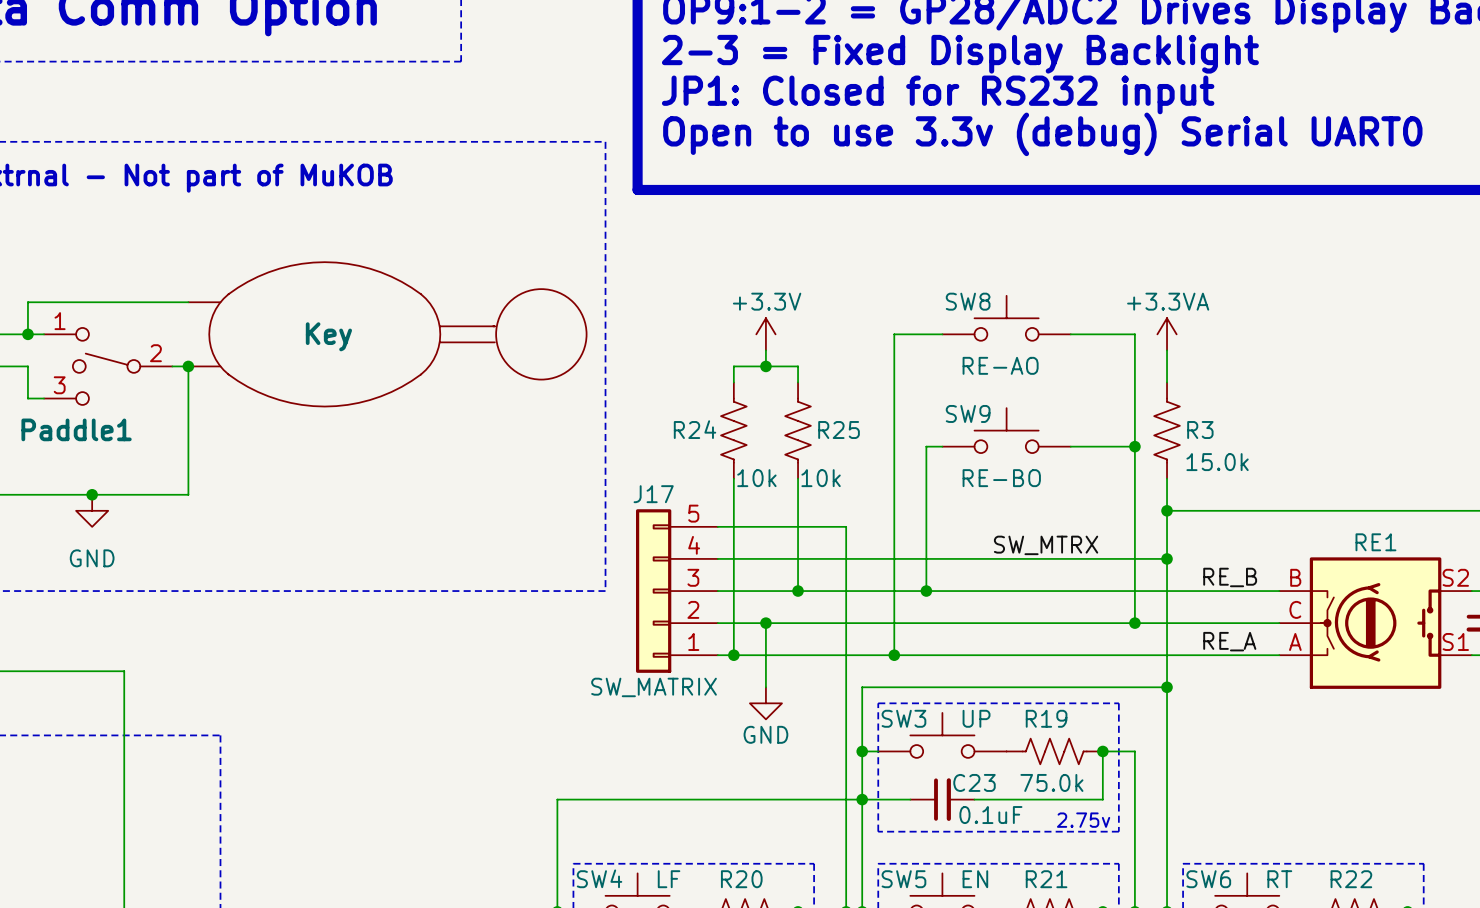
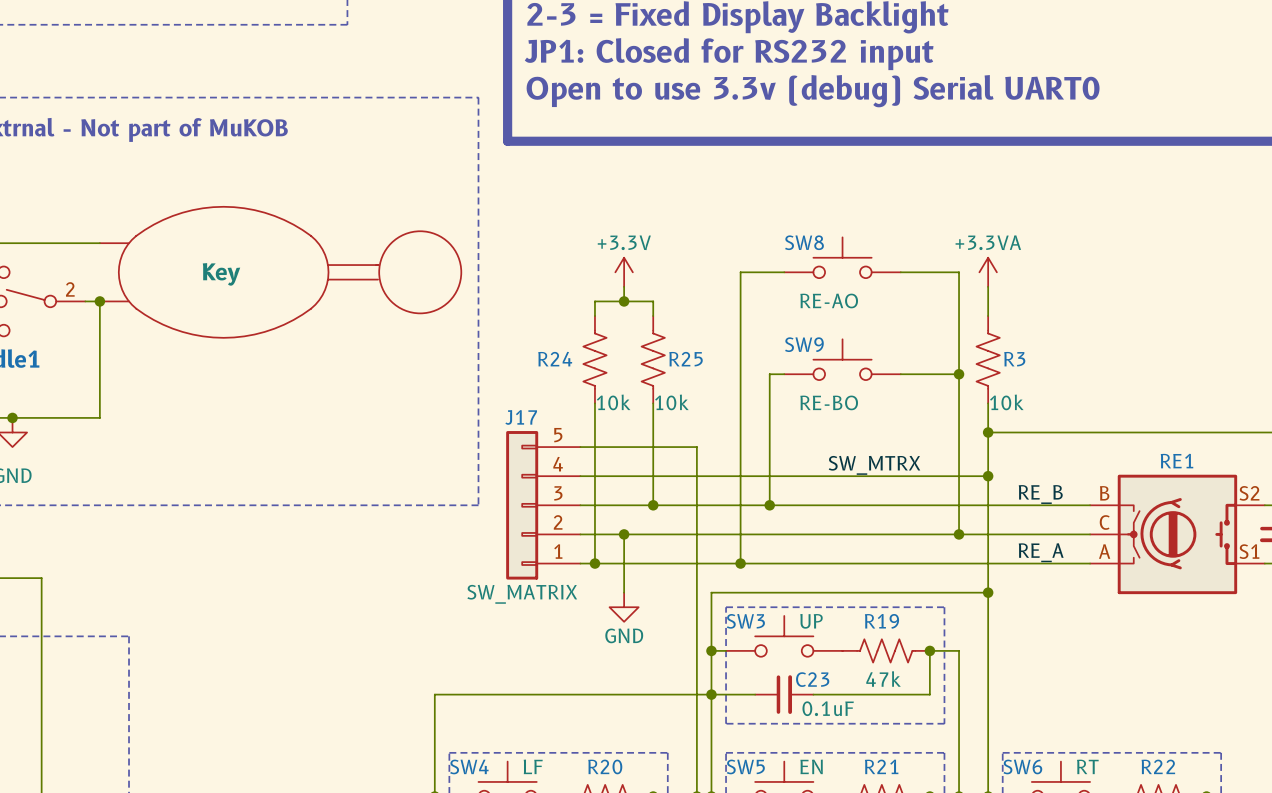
R3 value: 15.0k (1217, 462) -> 10k (1006, 402)
R19 value: 75.0k (1051, 782) -> 47k (883, 679)
text: 2.75v (1083, 820) -> none

